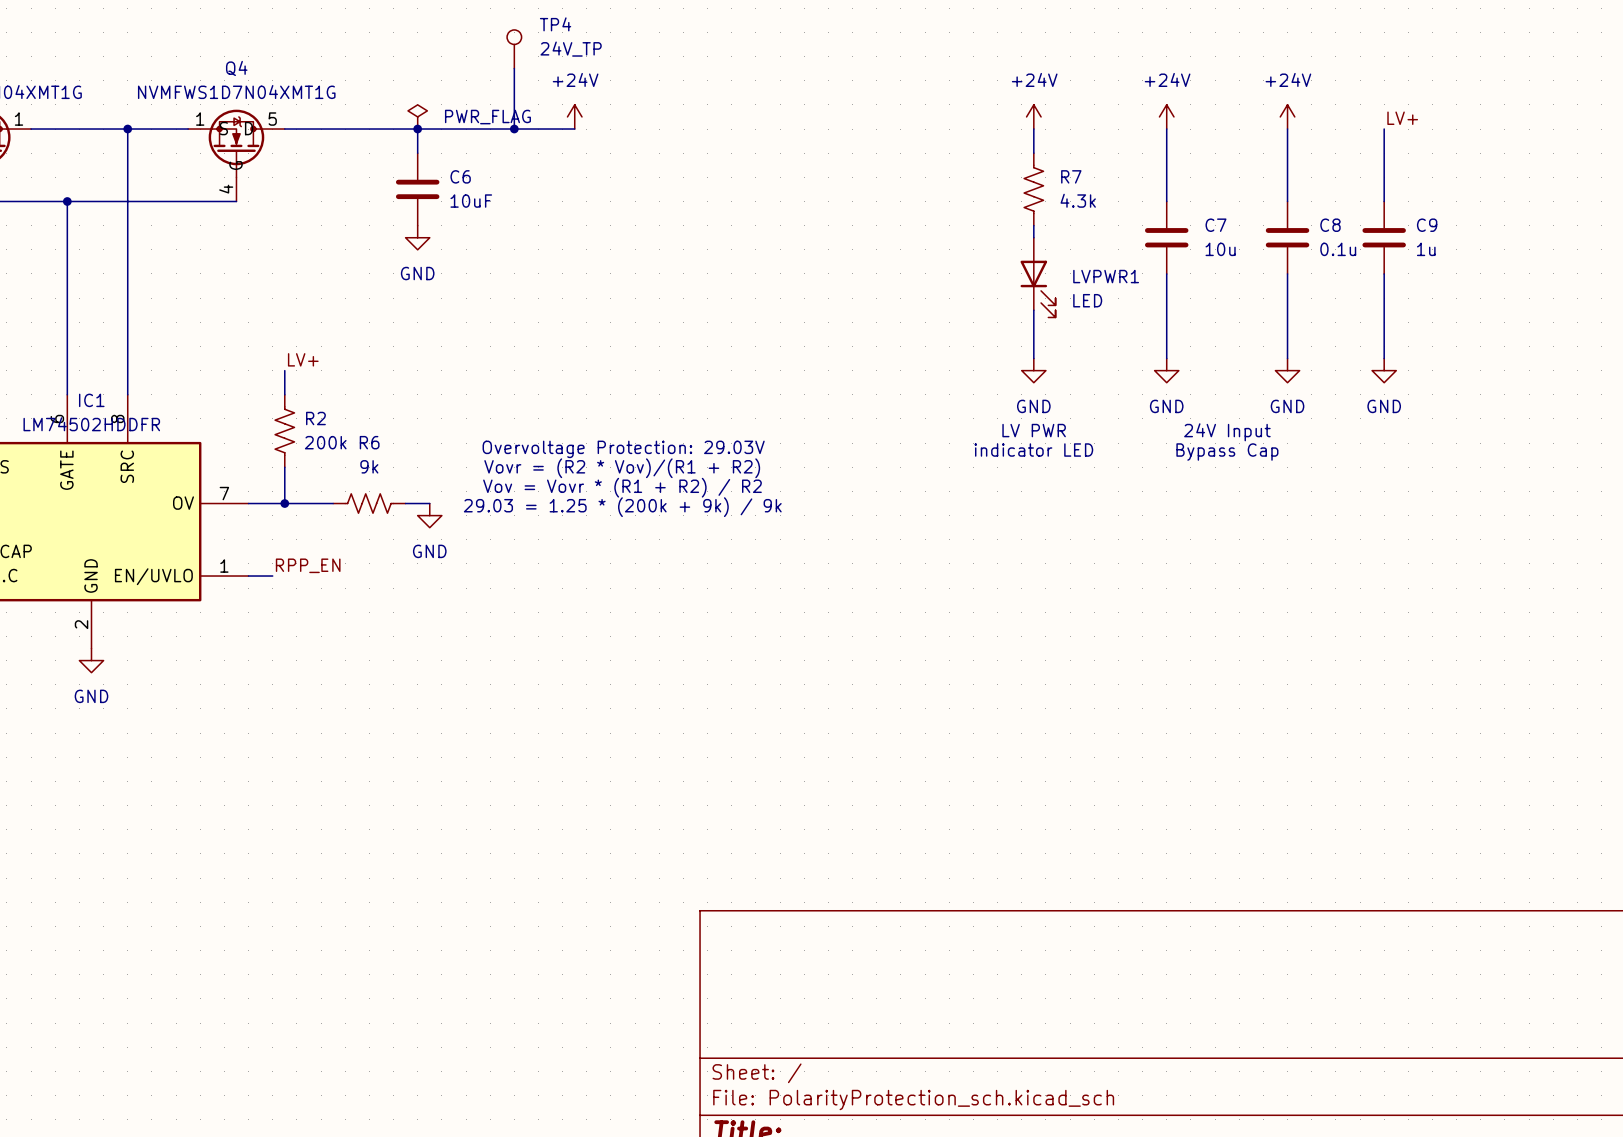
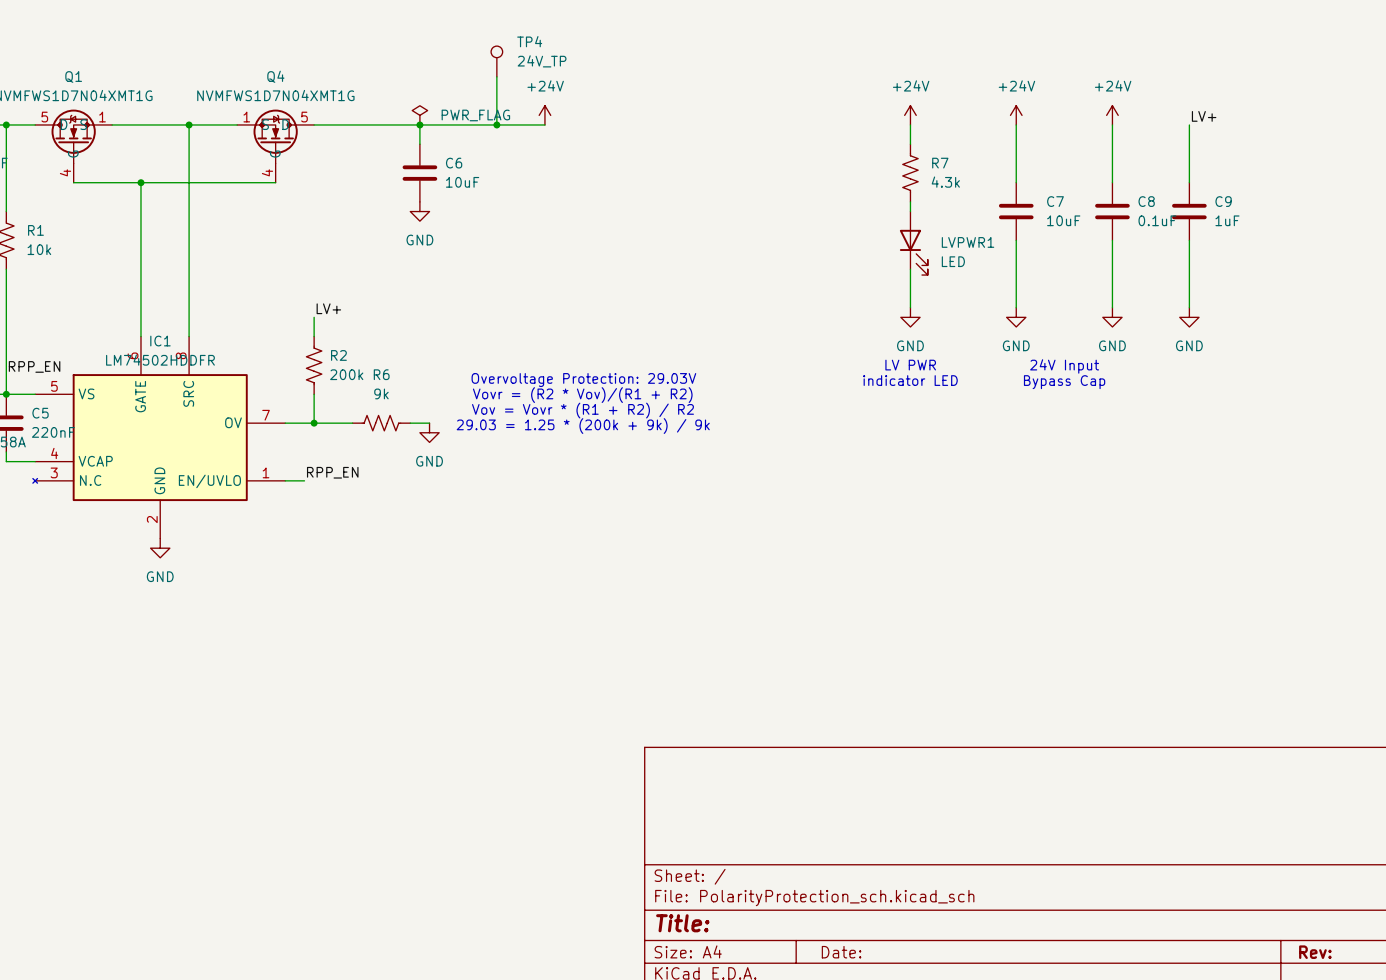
C7 value: 10u (1220, 249) -> 10uF (1063, 220)
C8 value: 0.1u (1338, 249) -> 0.1uF (1157, 220)
C9 value: 1u (1426, 249) -> 1uF (1227, 220)

